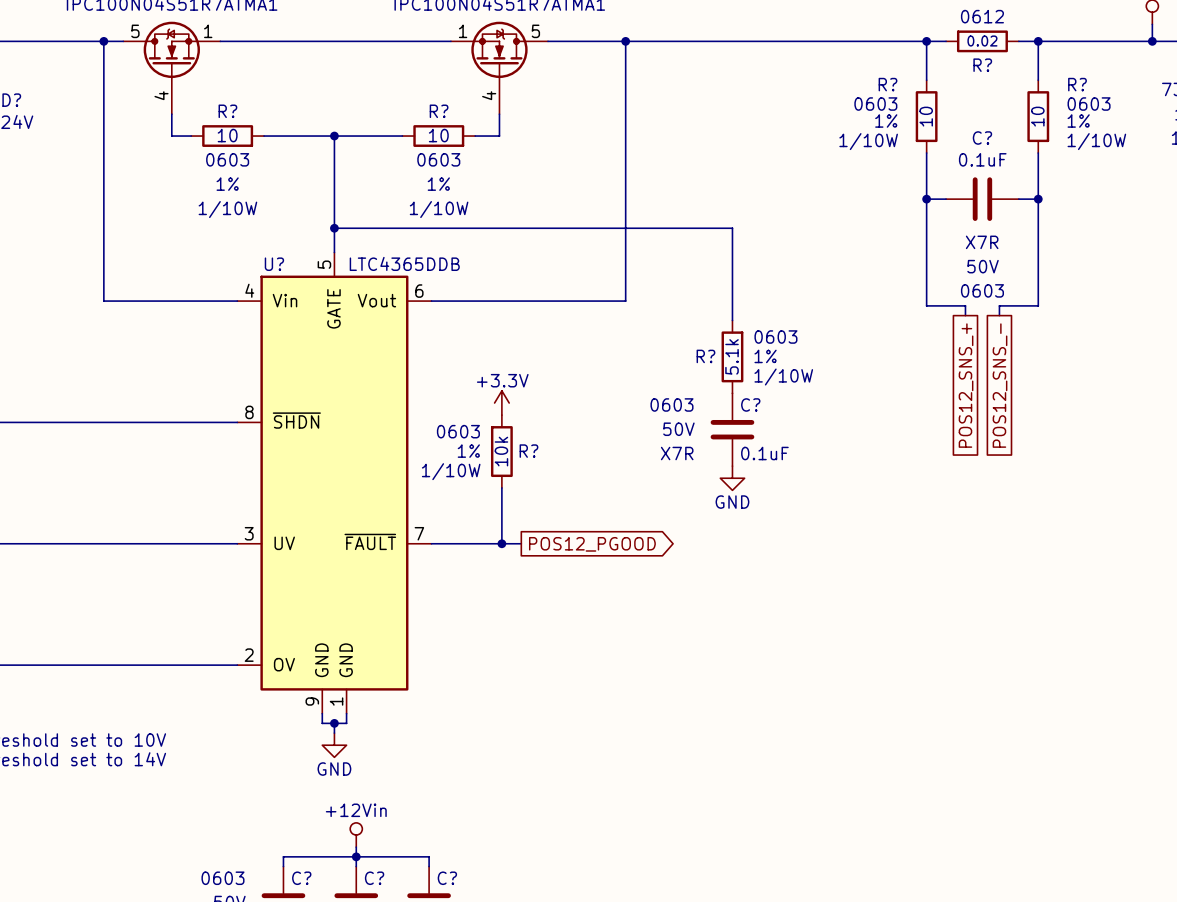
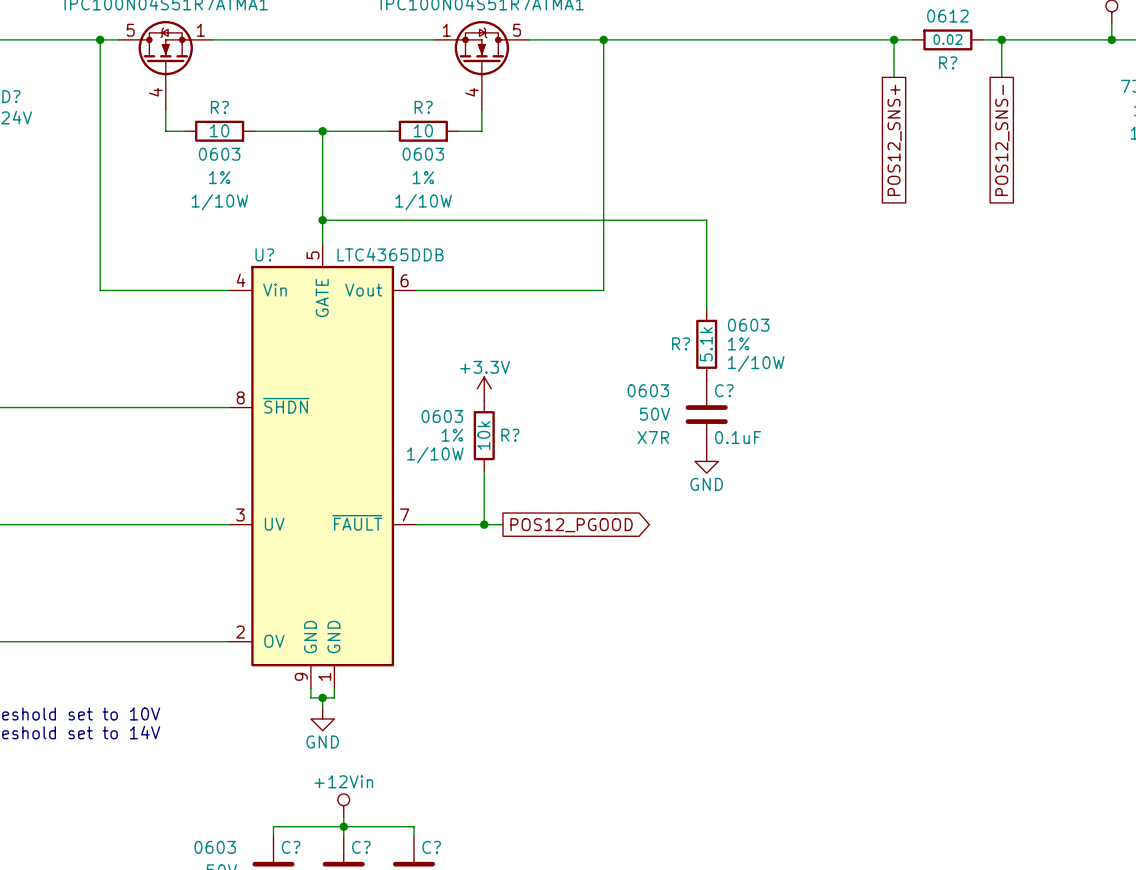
R?: 10 (926, 116) -> none
R?: 10 (1038, 116) -> none
global label: none -> POS12_SNS+ (894, 140)
global label: none -> POS12_SNS- (1002, 140)
wire: (926, 153) (926, 305) (965, 305) (965, 315) -> none
wire: (1038, 153) (1038, 305) (999, 305) (999, 315) -> none
wire: (926, 199) (946, 199) -> none
junction: (926, 199) -> none
C?: 0.1uF (982, 199) -> none
wire: (1018, 199) (1038, 199) -> none
junction: (1038, 199) -> none
global label: POS12_SNS_+ (966, 385) -> none
global label: POS12_SNS_- (1000, 385) -> none

